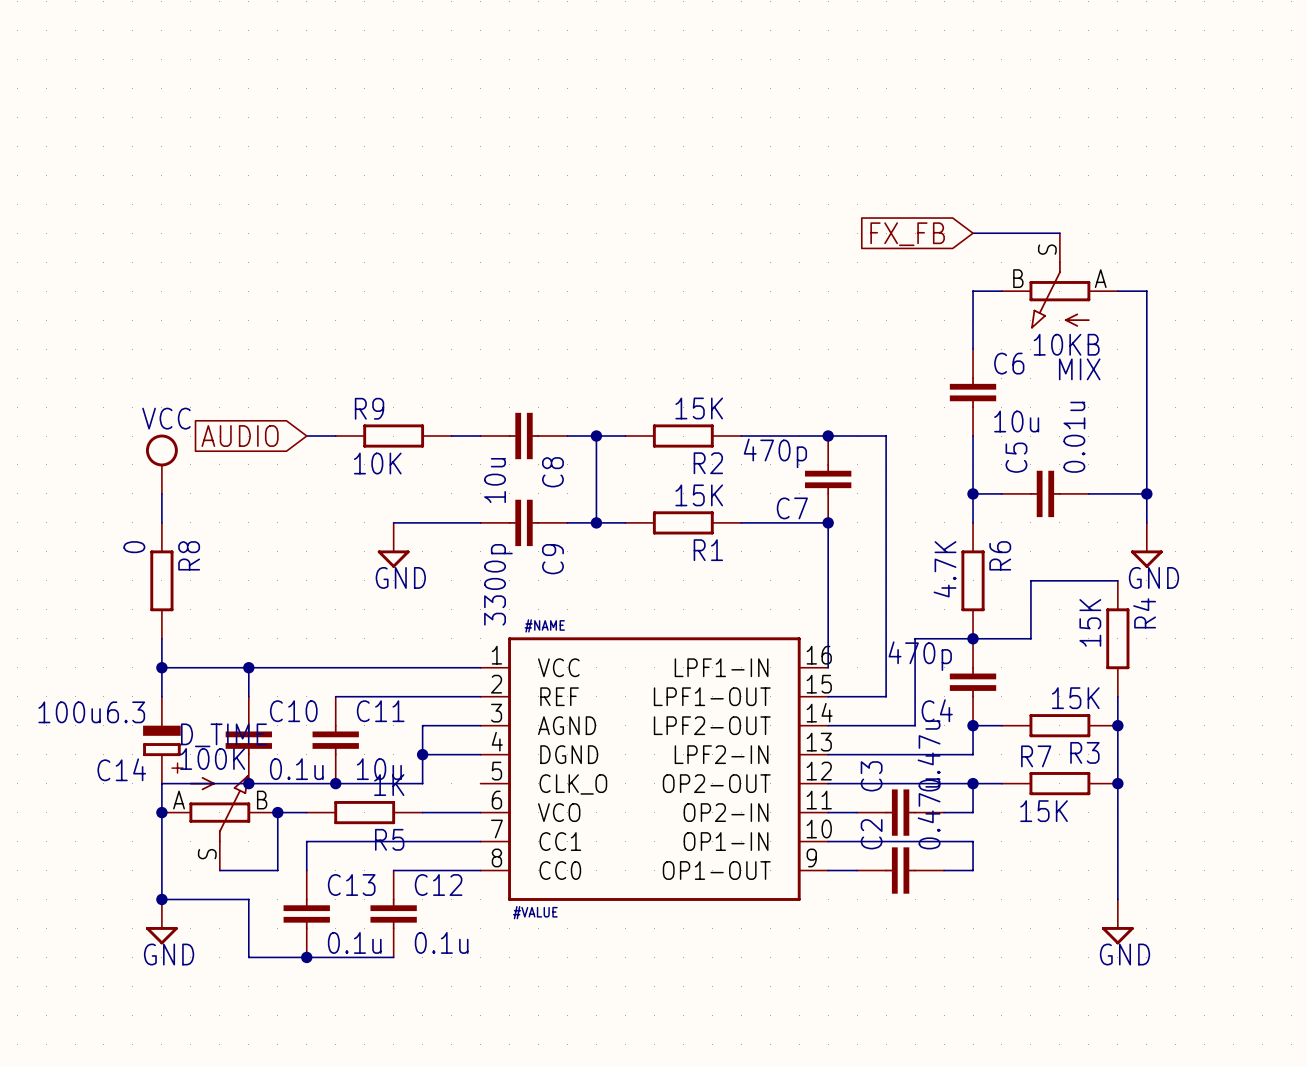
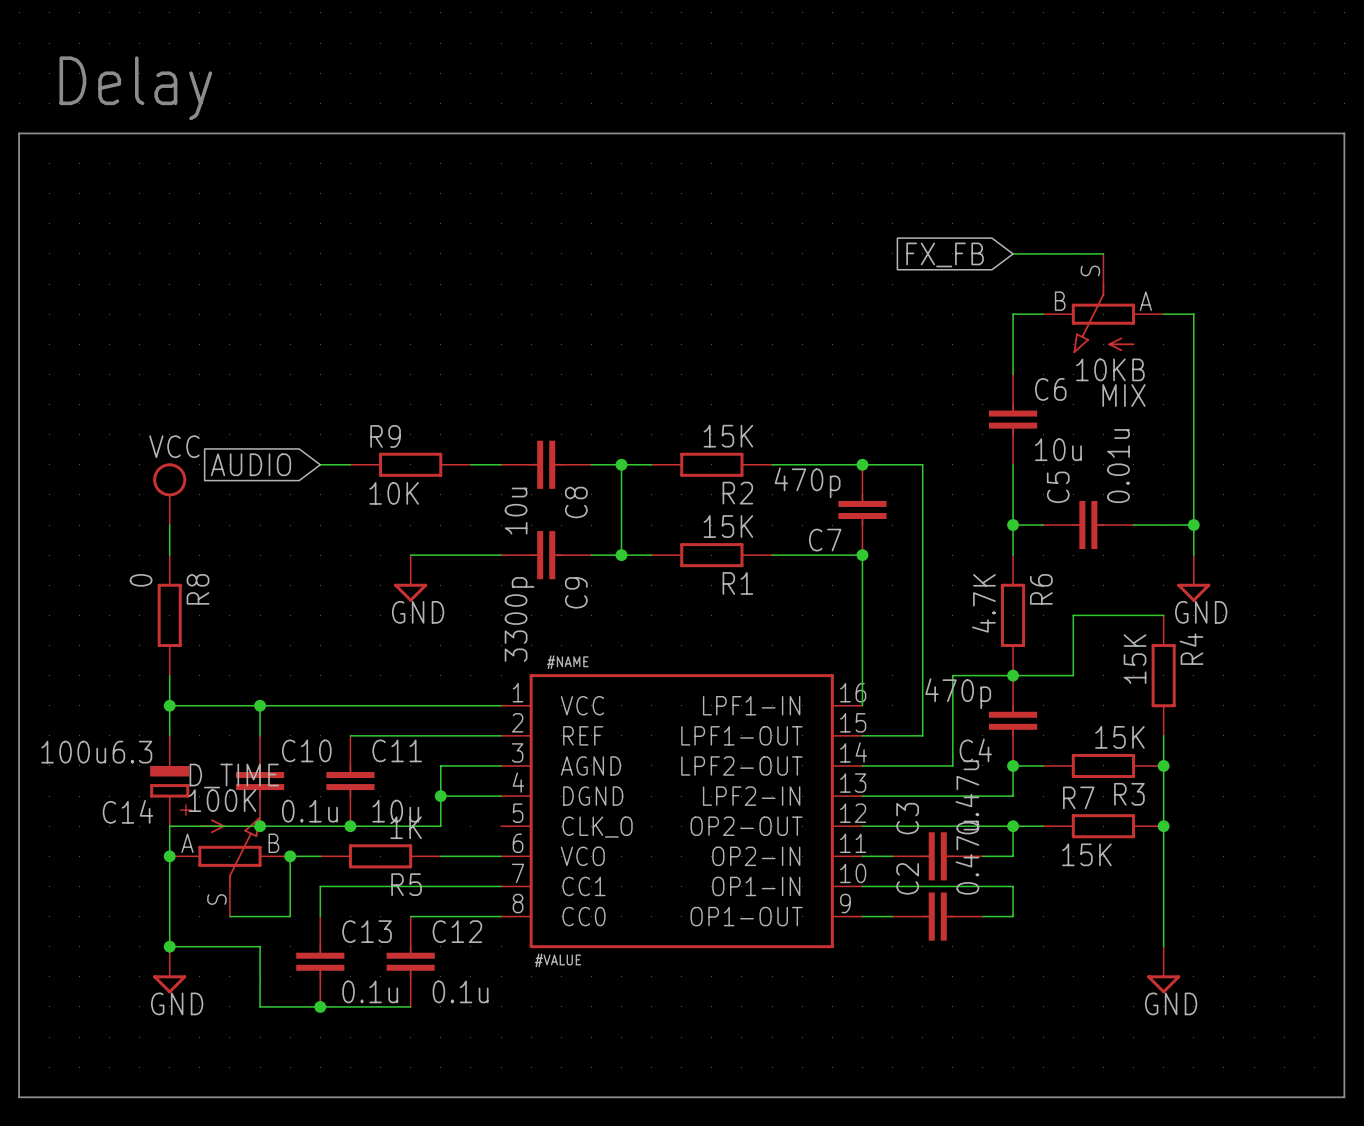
text: none -> Delay (135, 88)
line: none -> (19, 133) (19, 1097) (1344, 1097) (1344, 133) (19, 133)

